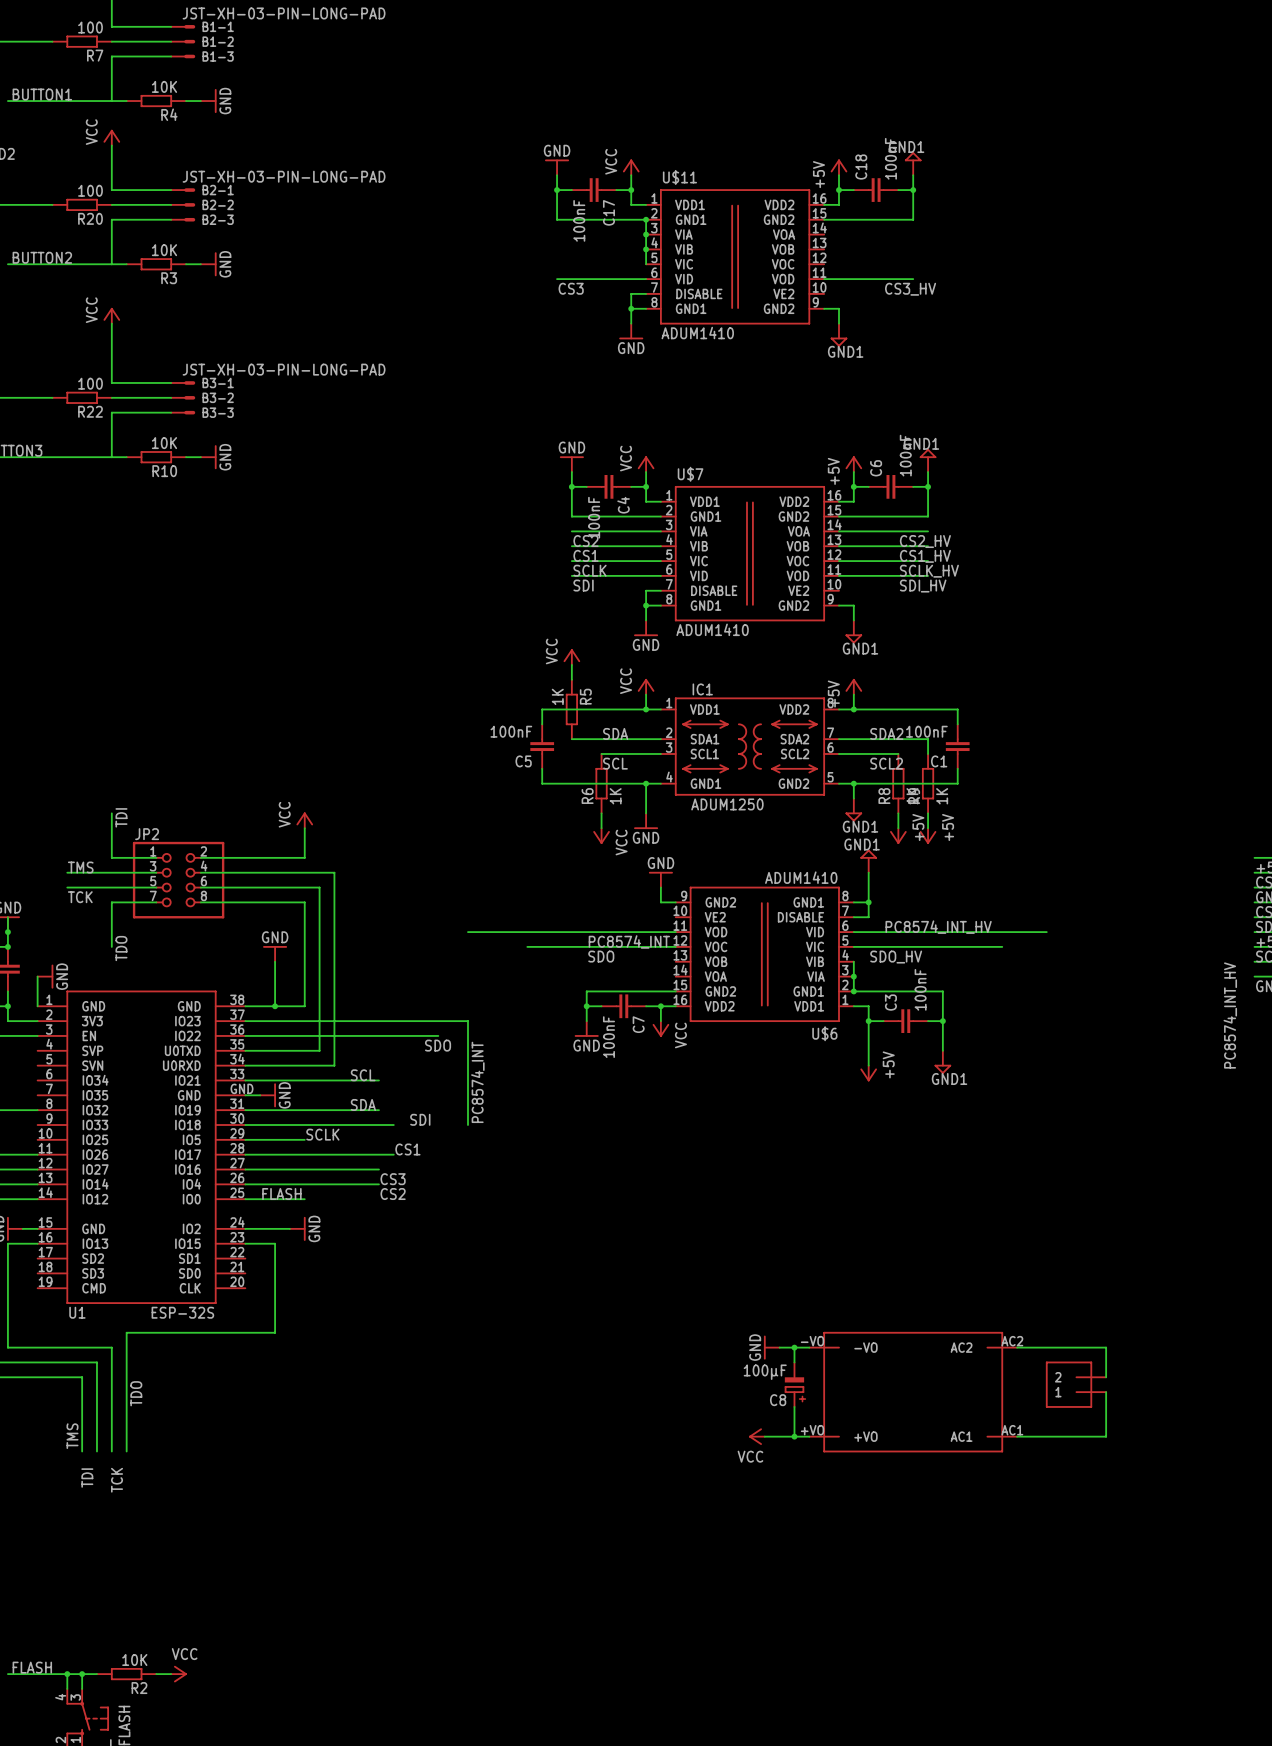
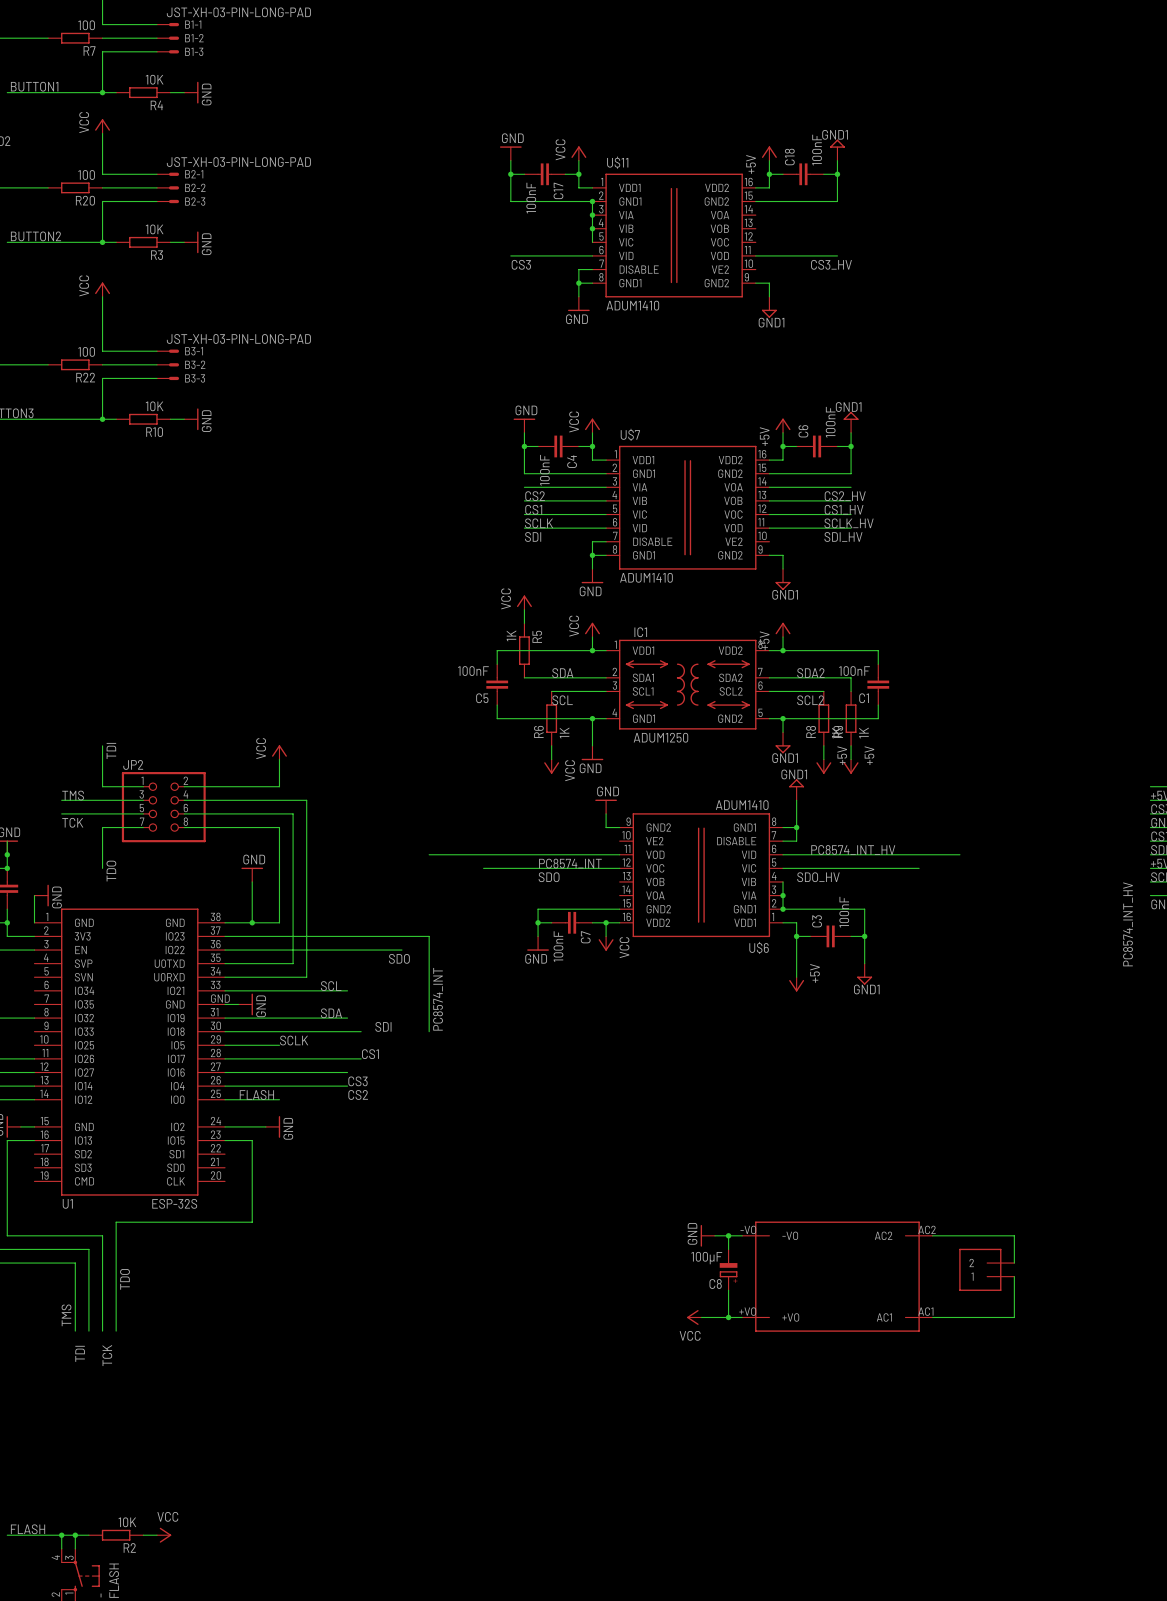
junction: none -> (102, 92)
junction: none -> (102, 242)
junction: none -> (102, 419)

